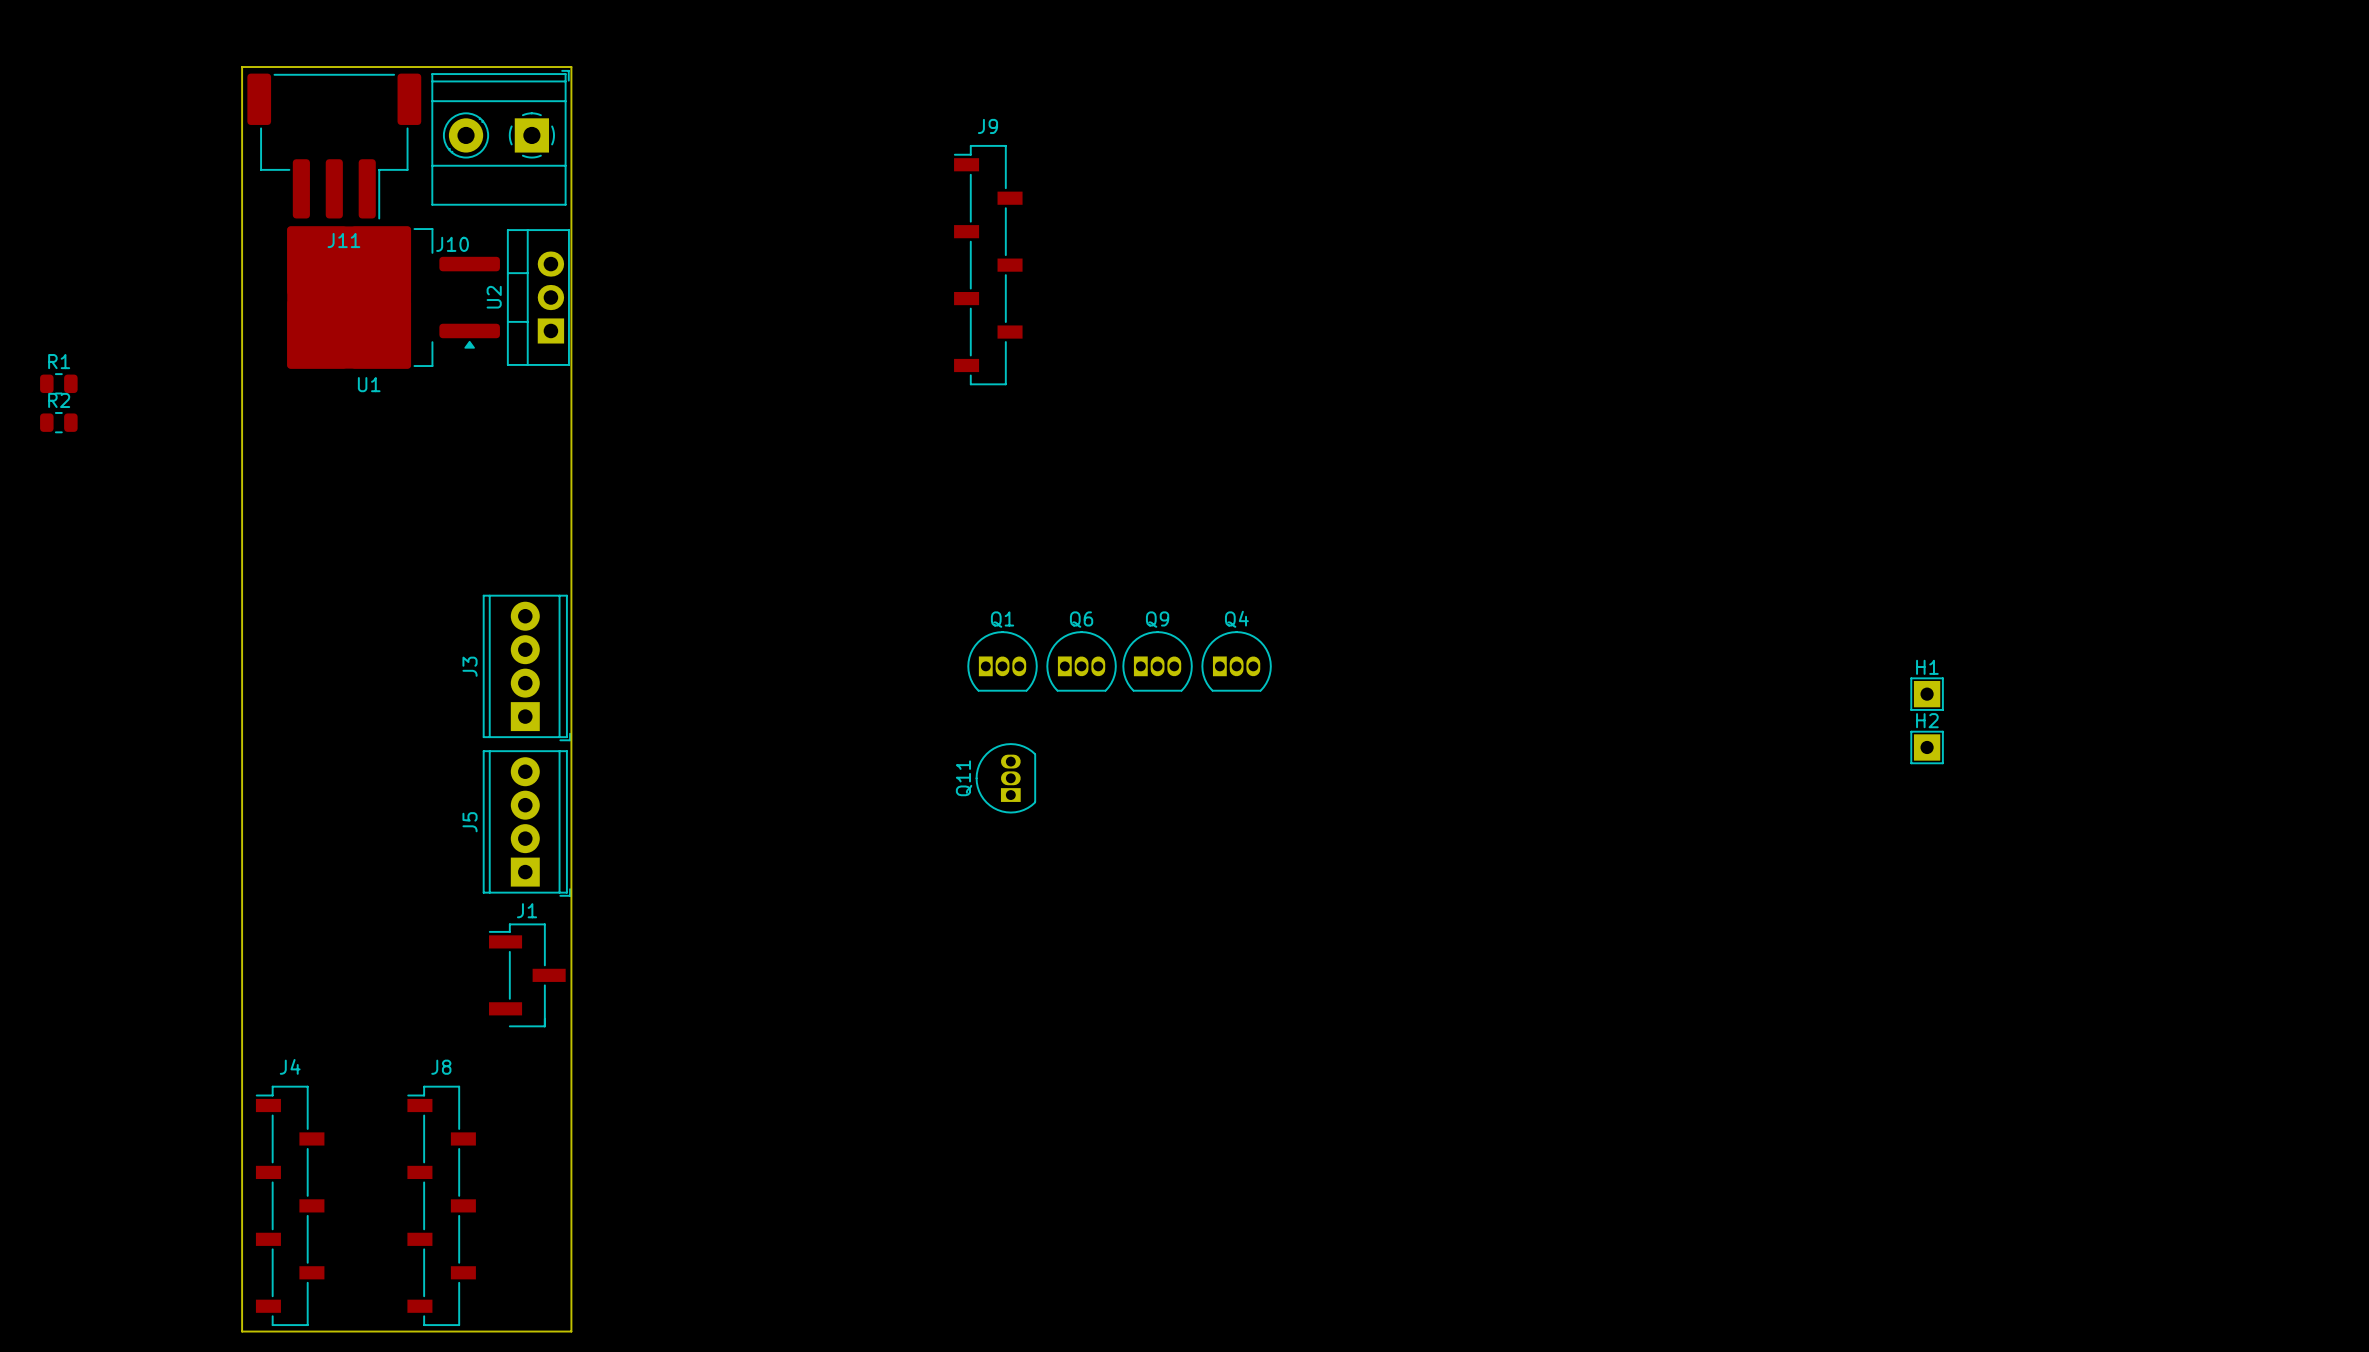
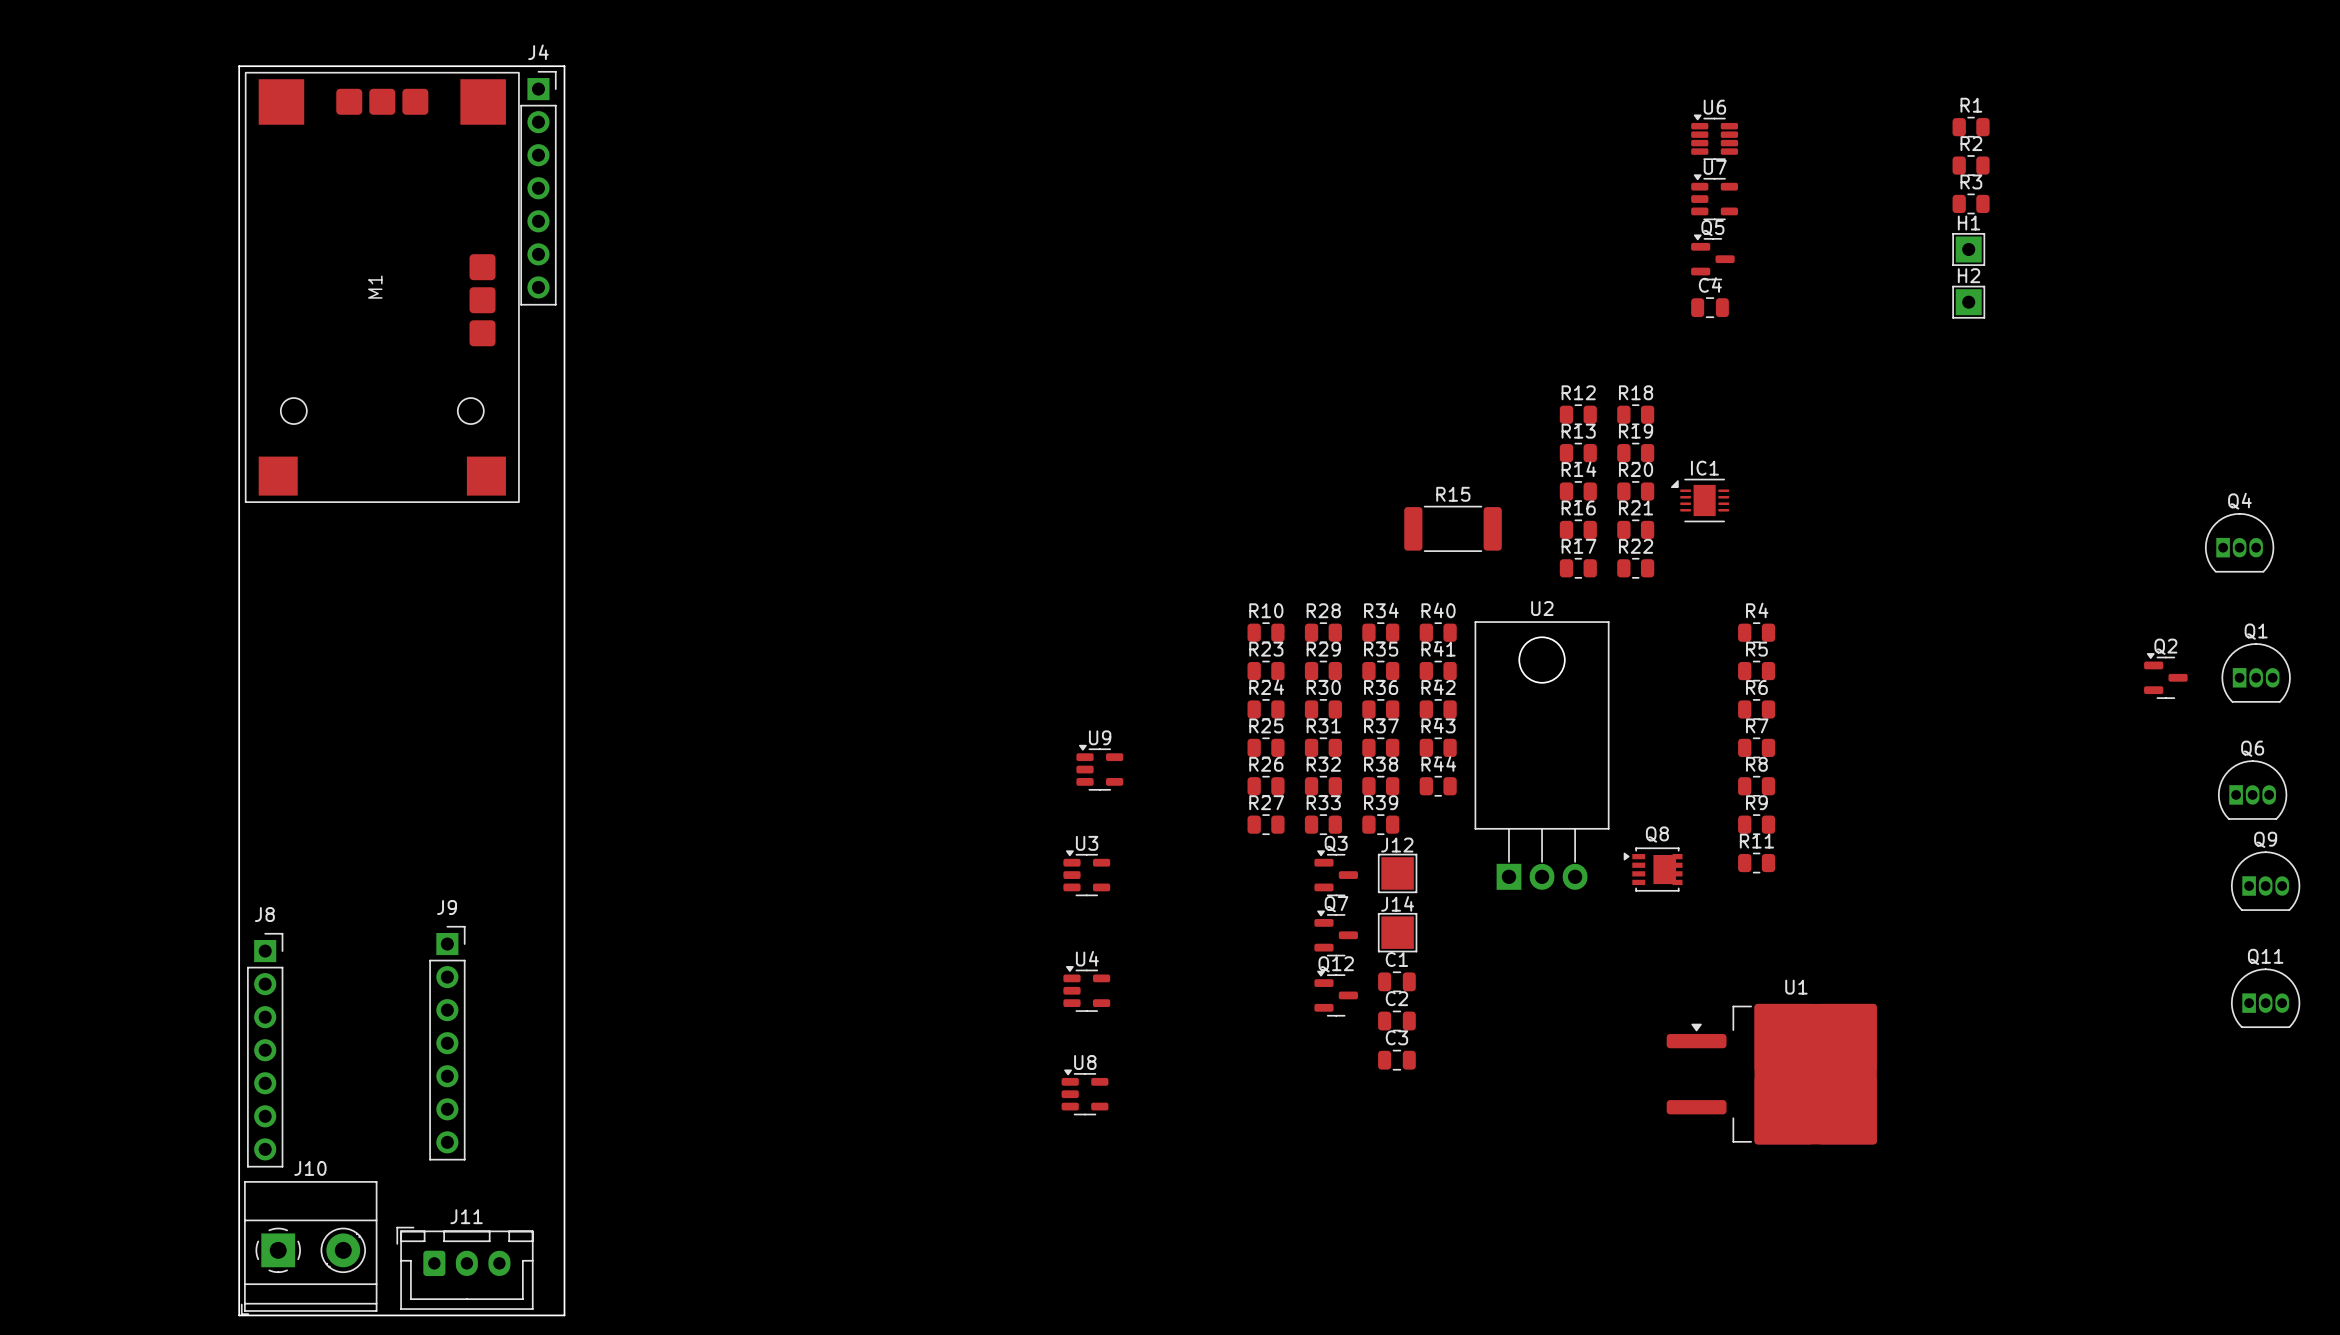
J11 footprint: [247, 73, 422, 220] -> [396, 1226, 534, 1310]
J10 rotation: 0° (500, 137) -> 180° (309, 1248)
J10 position: (500, 137) -> (309, 1248)
U6: none -> (1714, 137)
J9 footprint: [954, 145, 1023, 386] -> [429, 925, 466, 1161]
U7: none -> (1714, 197)
R3: none -> (1971, 203)
U2 footprint: [507, 229, 570, 366] -> [1474, 621, 1610, 890]
J11 name position: J11 (343, 240) -> J11 (466, 1216)
J10 name position: J10 (452, 244) -> J10 (310, 1168)
Q5: none -> (1712, 257)
M1: none -> (382, 287)
U1 rotation: 0° (393, 297) -> 180° (1771, 1074)
U1 position: (393, 297) -> (1771, 1074)
U2 name position: U2 (494, 297) -> U2 (1542, 608)
C4: none -> (1710, 307)
R1 position: (58, 383) -> (1971, 127)
R12: none -> (1578, 414)
R18: none -> (1635, 414)
R2 position: (58, 422) -> (1971, 165)
R13: none -> (1578, 453)
R19: none -> (1635, 453)
R14: none -> (1578, 491)
R20: none -> (1635, 491)
IC1: none -> (1699, 500)
R15: none -> (1453, 528)
R16: none -> (1578, 529)
R21: none -> (1635, 529)
R17: none -> (1578, 568)
R22: none -> (1635, 568)
R10: none -> (1266, 632)
R28: none -> (1323, 632)
R34: none -> (1380, 632)
R40: none -> (1438, 632)
R4: none -> (1756, 632)
Q1 position: (1002, 661) -> (2256, 672)
Q6 position: (1081, 661) -> (2252, 790)
Q9 position: (1157, 661) -> (2265, 881)
Q4 position: (1236, 661) -> (2239, 542)
J3: (526, 667) -> none
R23: none -> (1266, 671)
R29: none -> (1323, 671)
R35: none -> (1380, 671)
R41: none -> (1438, 671)
R5: none -> (1756, 671)
Q2: none -> (2165, 675)
H1 position: (1927, 694) -> (1968, 249)
R24: none -> (1266, 709)
R30: none -> (1323, 709)
R36: none -> (1380, 709)
R42: none -> (1438, 709)
R6: none -> (1756, 709)
H2 position: (1927, 747) -> (1968, 302)
R25: none -> (1266, 747)
R31: none -> (1323, 747)
R37: none -> (1380, 747)
R43: none -> (1438, 747)
R7: none -> (1756, 747)
U9: none -> (1099, 767)
Q11 rotation: 0° (1005, 778) -> 90° clockwise (2265, 998)
Q11 position: (1005, 778) -> (2265, 998)
R26: none -> (1266, 786)
R32: none -> (1323, 786)
R38: none -> (1380, 786)
R44: none -> (1438, 786)
R8: none -> (1756, 786)
J5: (526, 823) -> none
R27: none -> (1266, 824)
R33: none -> (1323, 824)
R39: none -> (1380, 824)
R9: none -> (1756, 824)
R11: none -> (1756, 863)
Q8: none -> (1653, 869)
U3: none -> (1086, 873)
Q3: none -> (1336, 873)
J12: none -> (1397, 873)
Q7: none -> (1336, 933)
J14: none -> (1397, 932)
J1: (527, 975) -> none
C1: none -> (1396, 981)
U4: none -> (1086, 988)
Q12: none -> (1336, 993)
C2: none -> (1396, 1021)
C3: none -> (1396, 1060)
J4 footprint: [255, 1085, 325, 1326] -> [520, 71, 557, 306]
J8 footprint: [407, 1085, 476, 1326] -> [247, 932, 284, 1168]
U8: none -> (1085, 1092)

